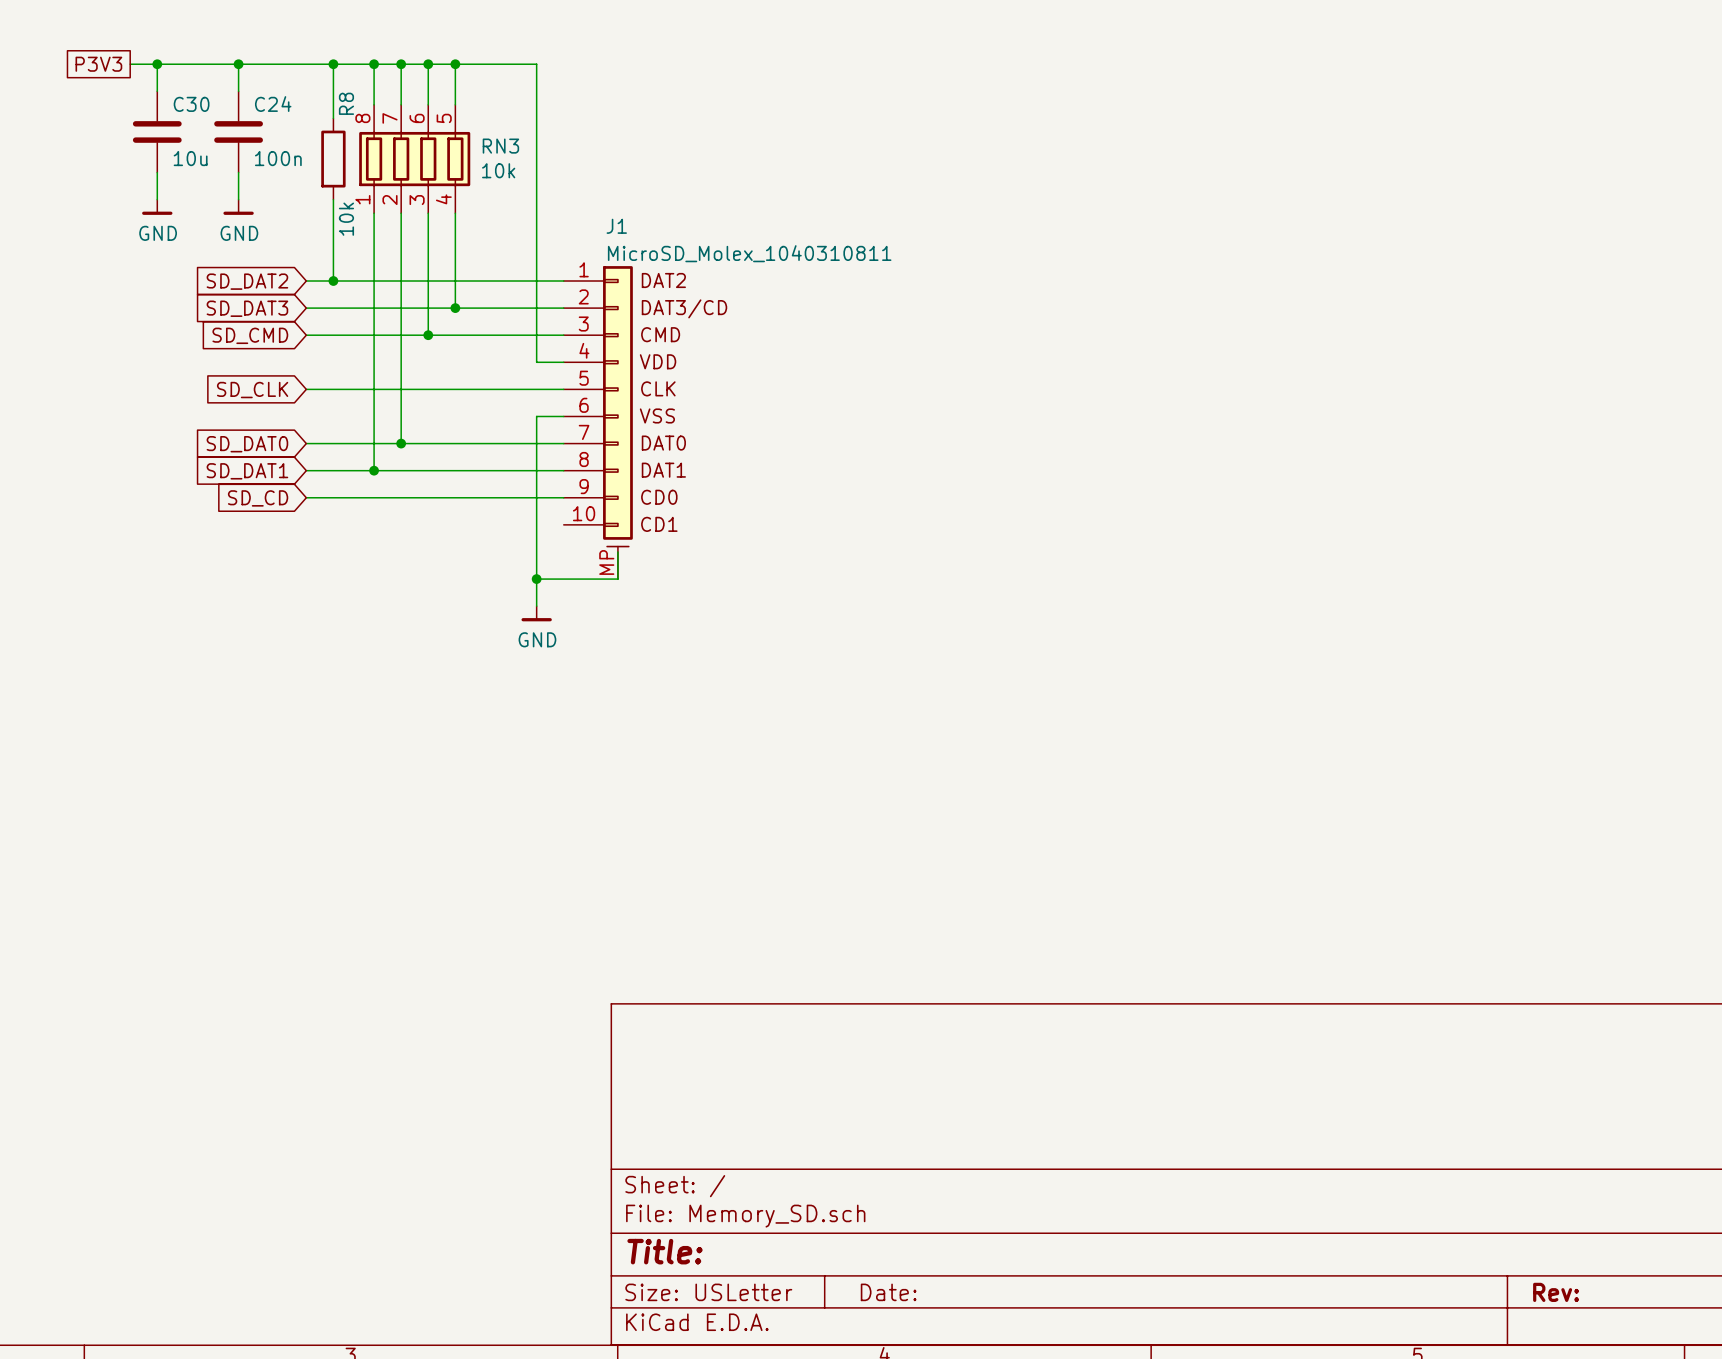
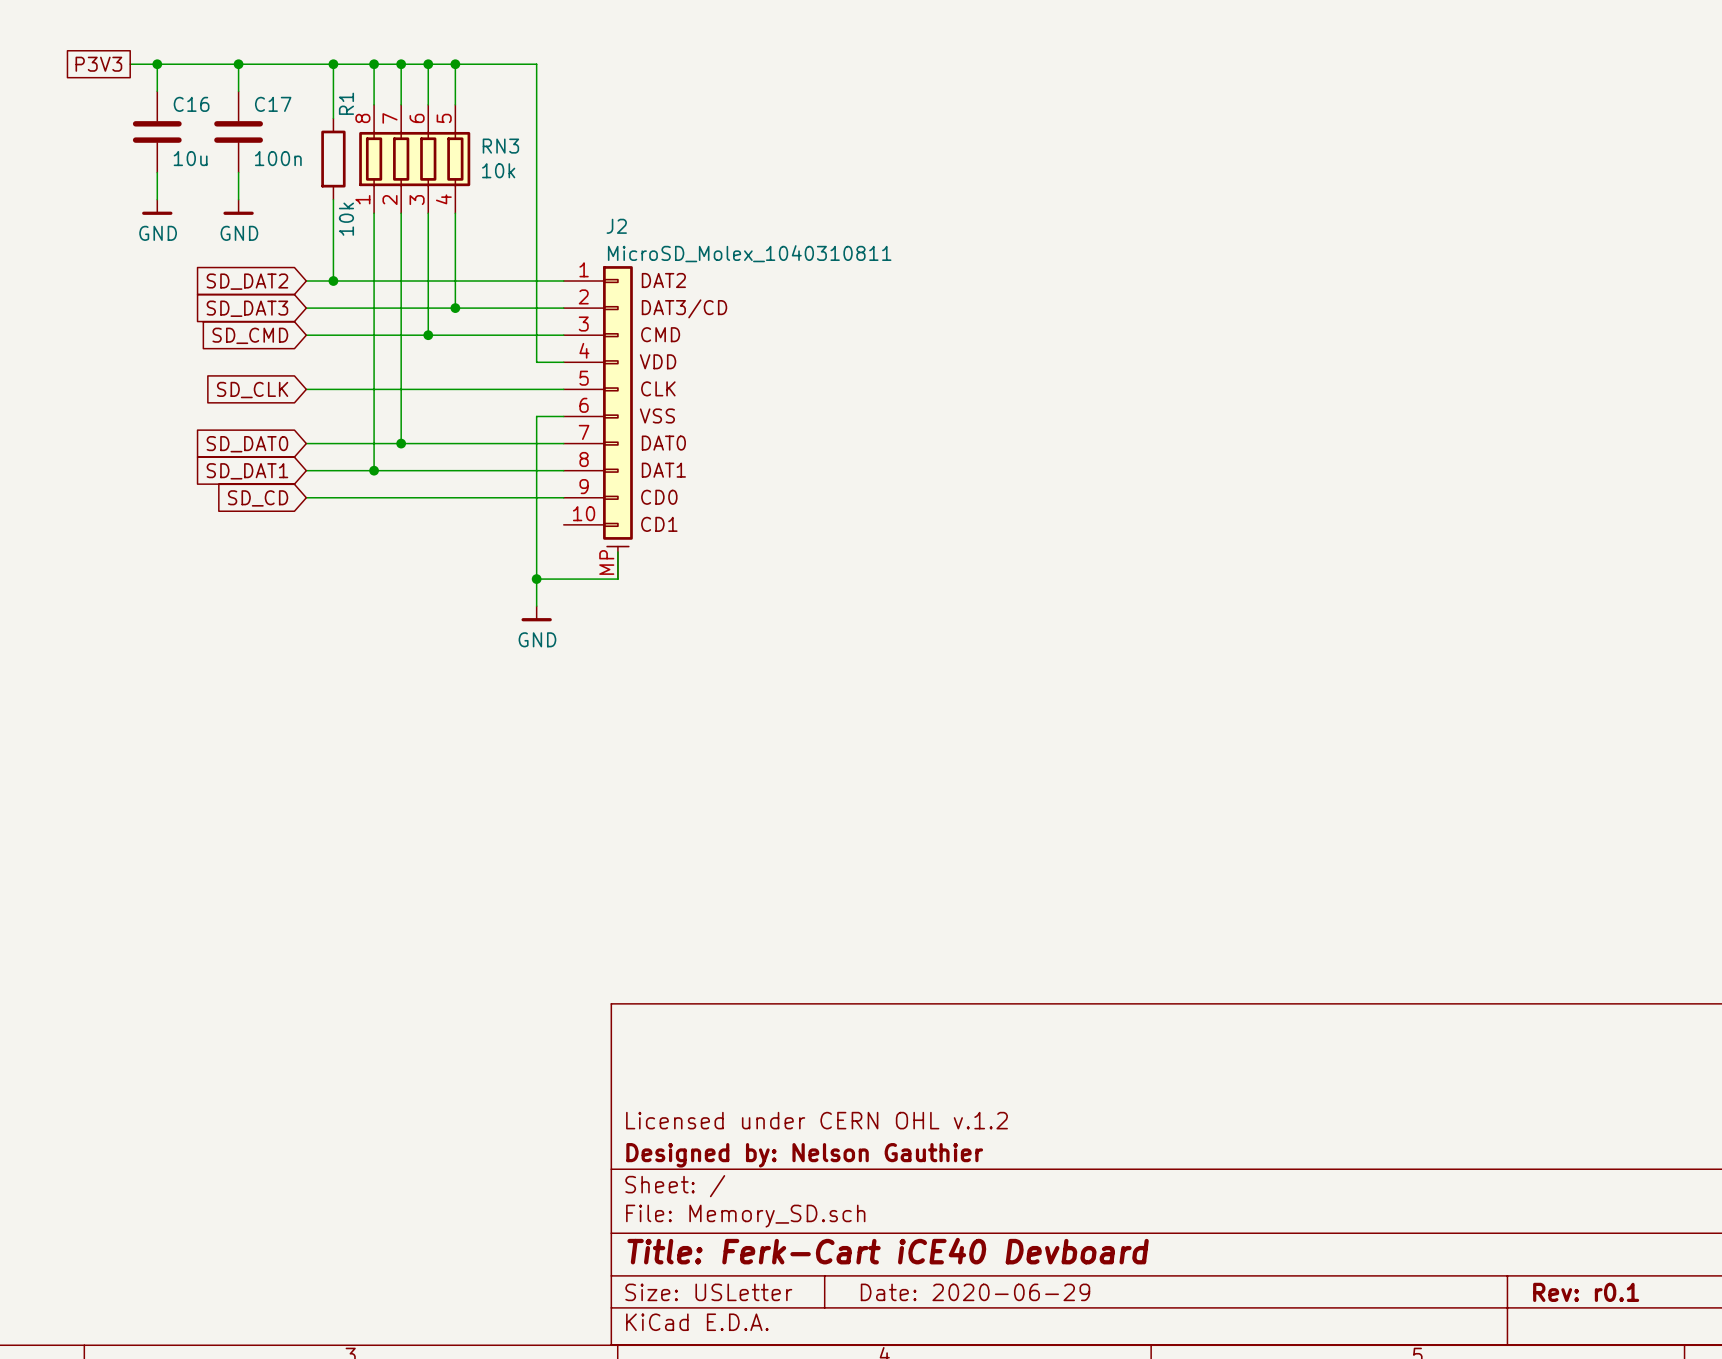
R8 name: R8 (346, 103) -> R1 (346, 103)
C30 name: C30 (191, 104) -> C16 (191, 104)
C24 name: C24 (273, 104) -> C17 (273, 104)
J1 name: J1 (616, 226) -> J2 (616, 226)
title block: none -> Licensed under CERN OHL v.1.2 (816, 1120)
title block: none -> Designed by: Nelson Gauthier (804, 1155)
title block: Title: (665, 1251) -> Title: Ferk-Cart iCE40 Devboard (888, 1251)
title block: Date: (888, 1292) -> Date: 2020-06-29 (975, 1292)
title block: Rev: (1556, 1292) -> Rev: r0.1 (1586, 1292)

